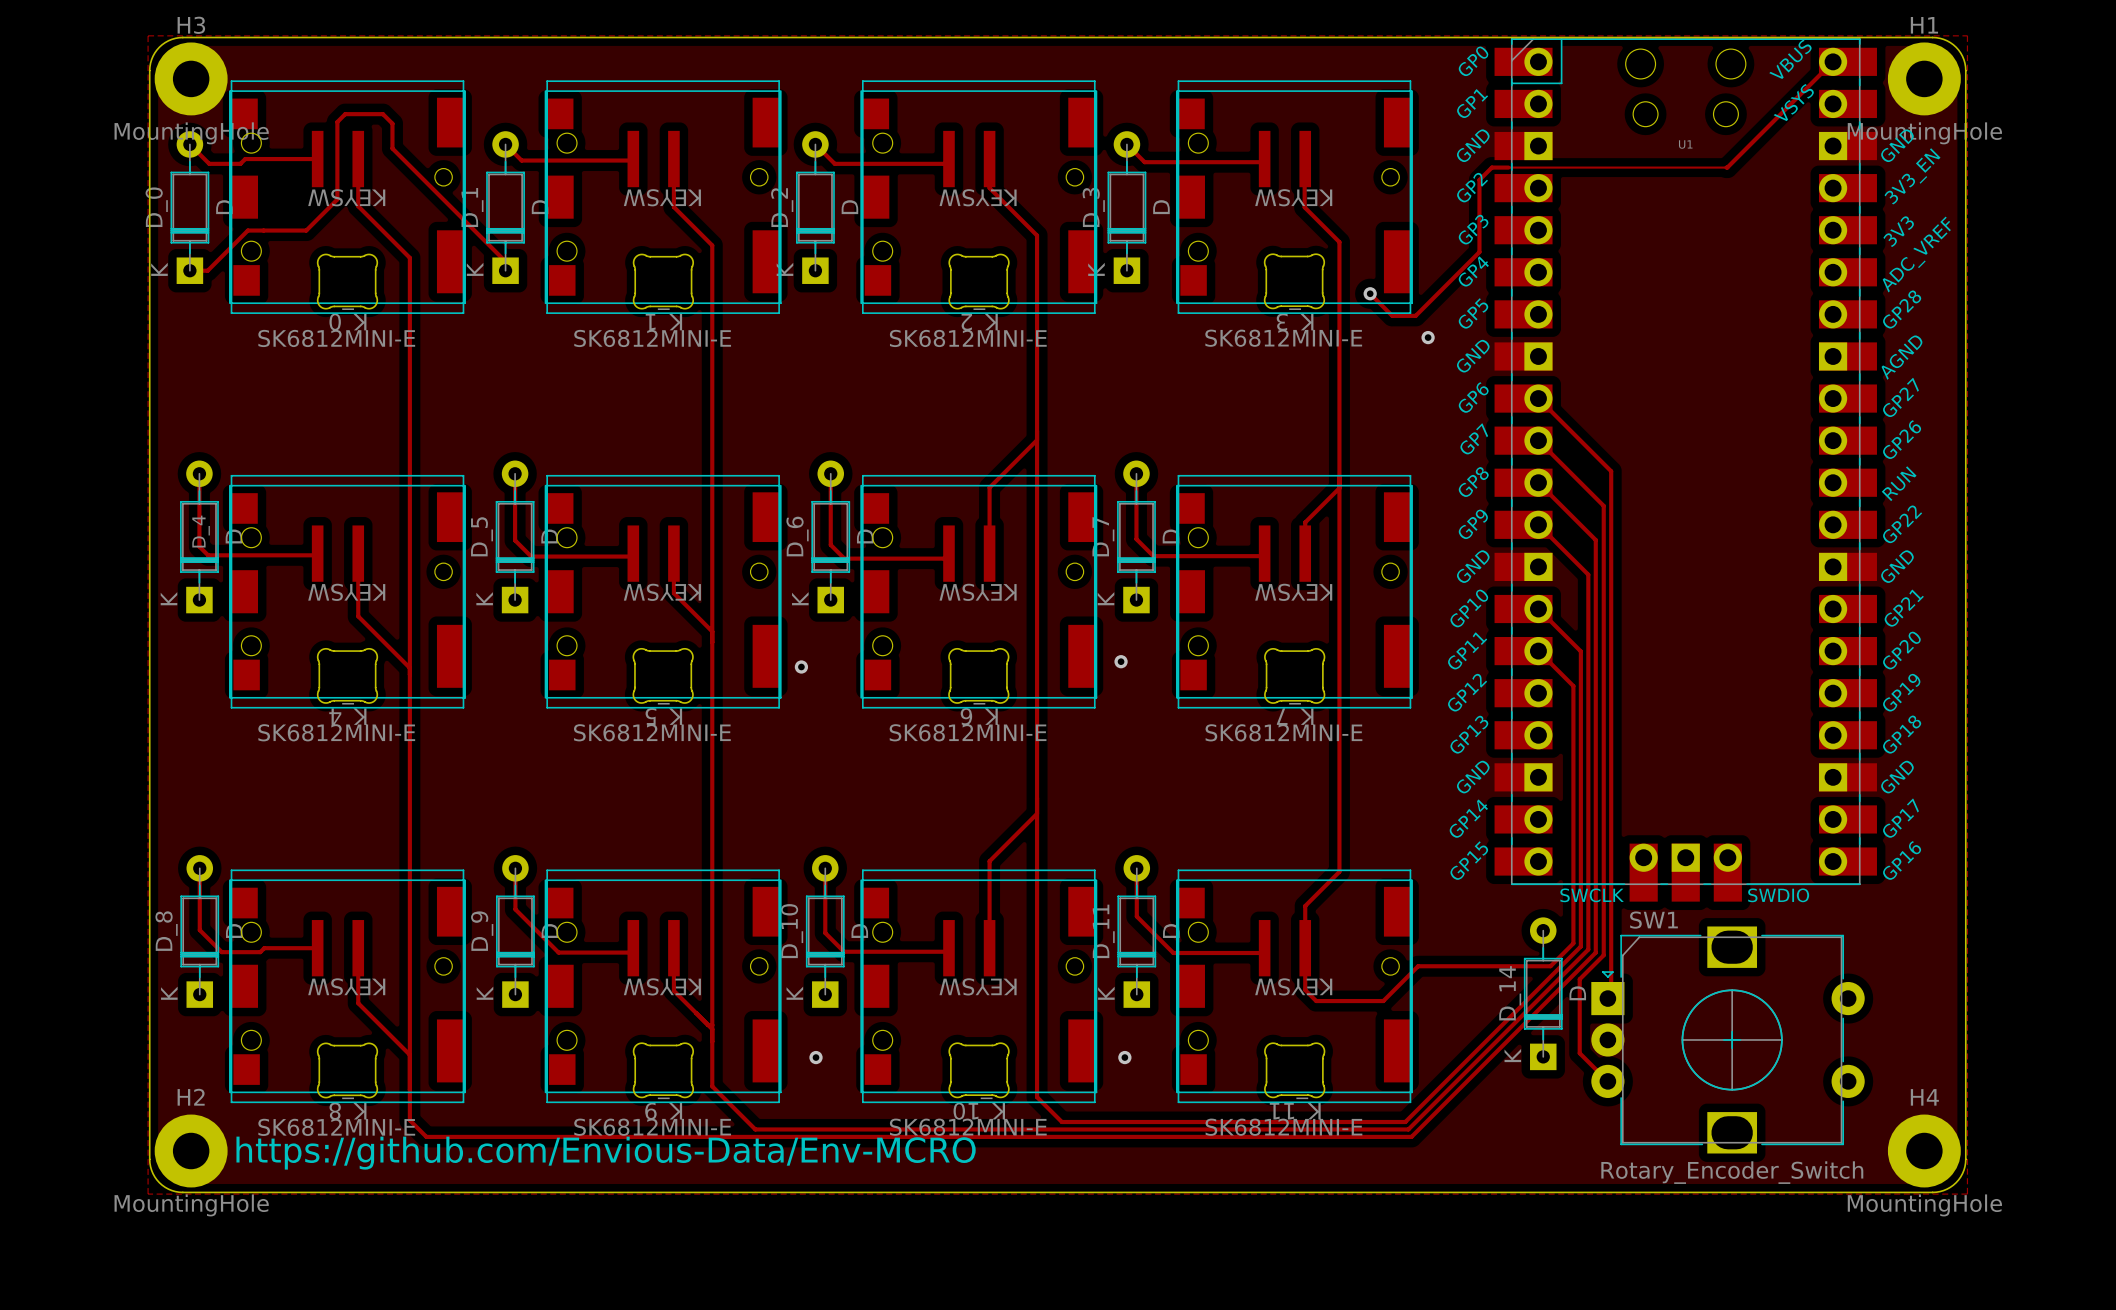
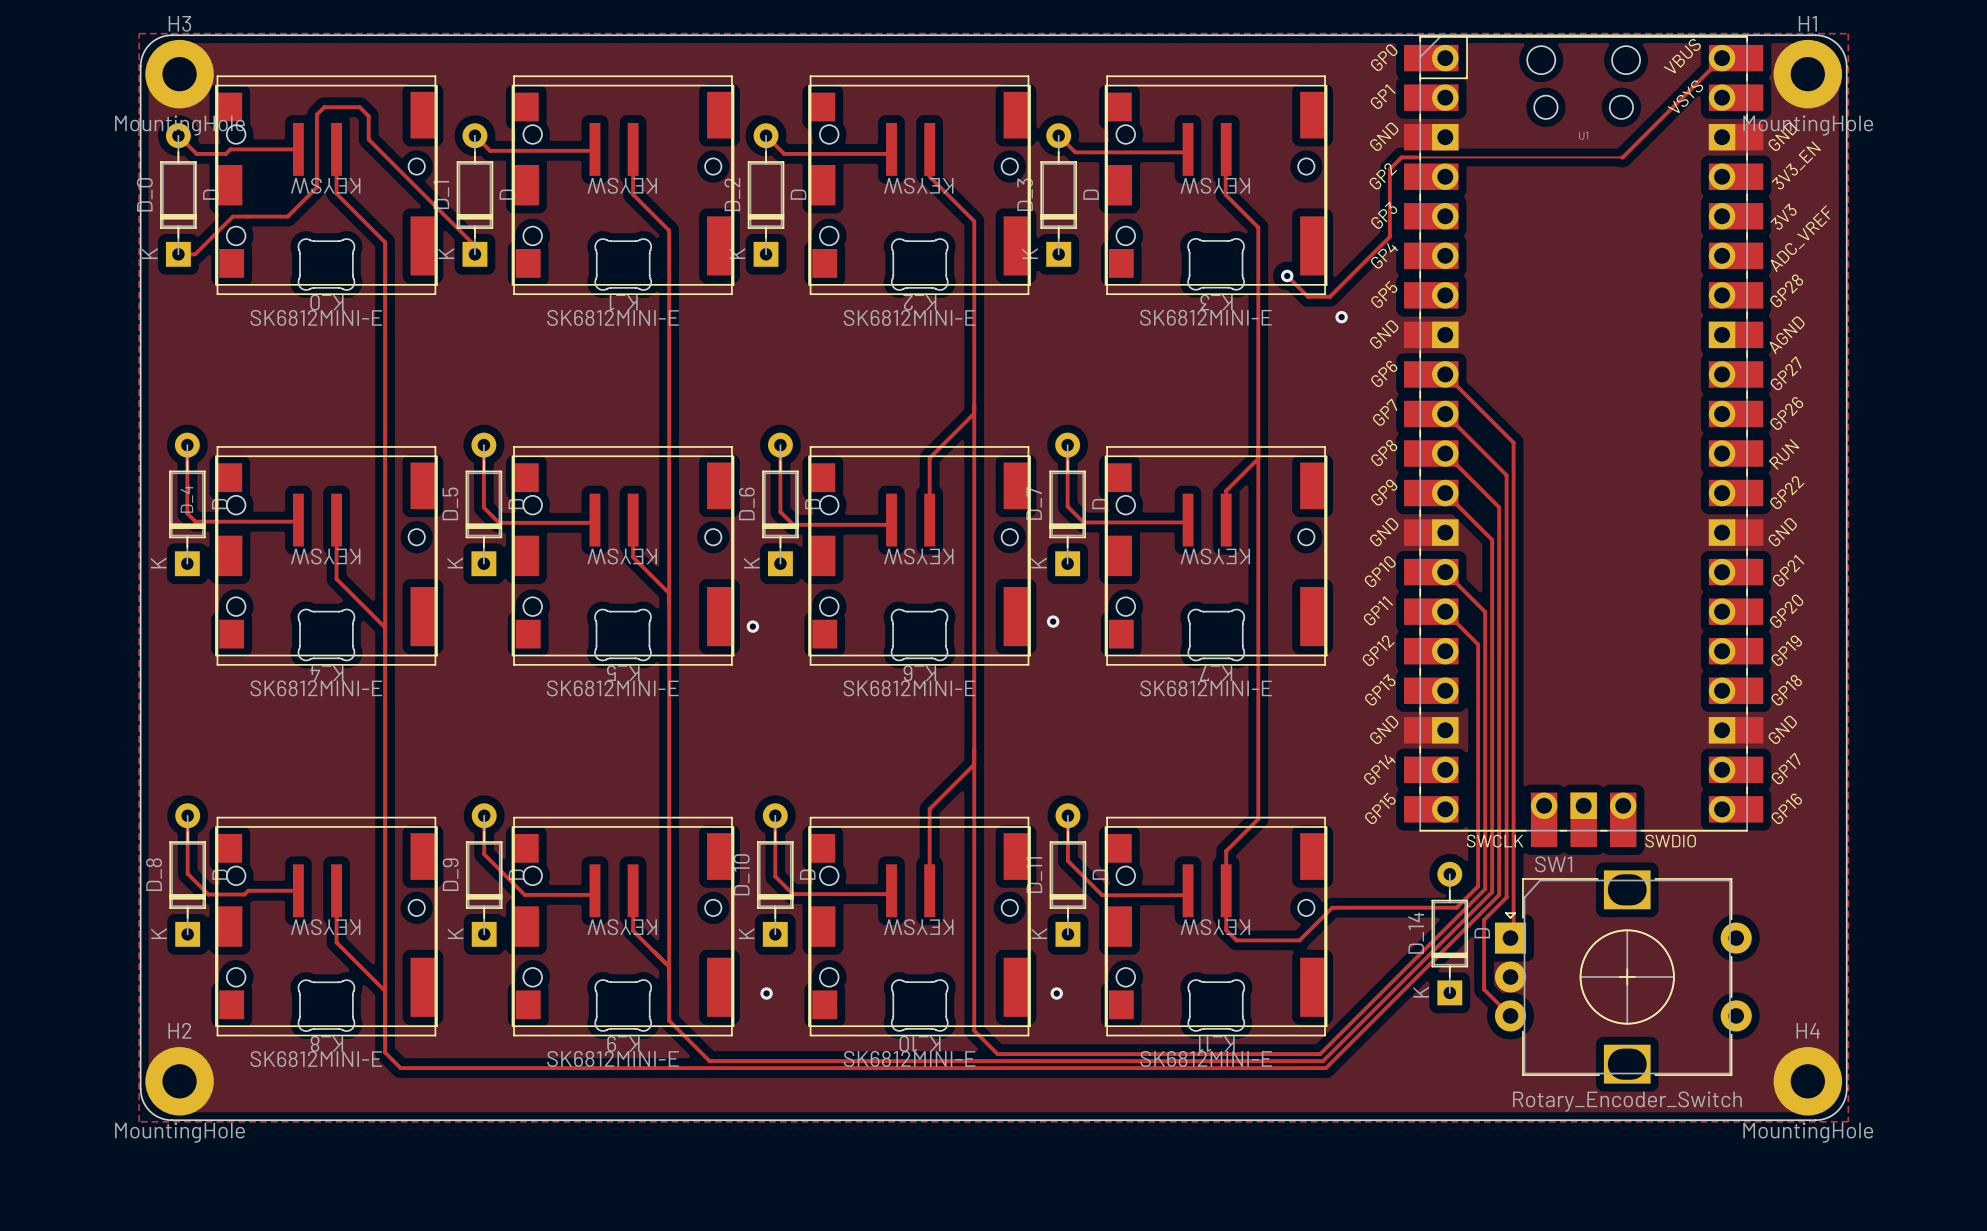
text: https://github.com/Envious-Data/Env-MCRO (606, 1153) -> none

